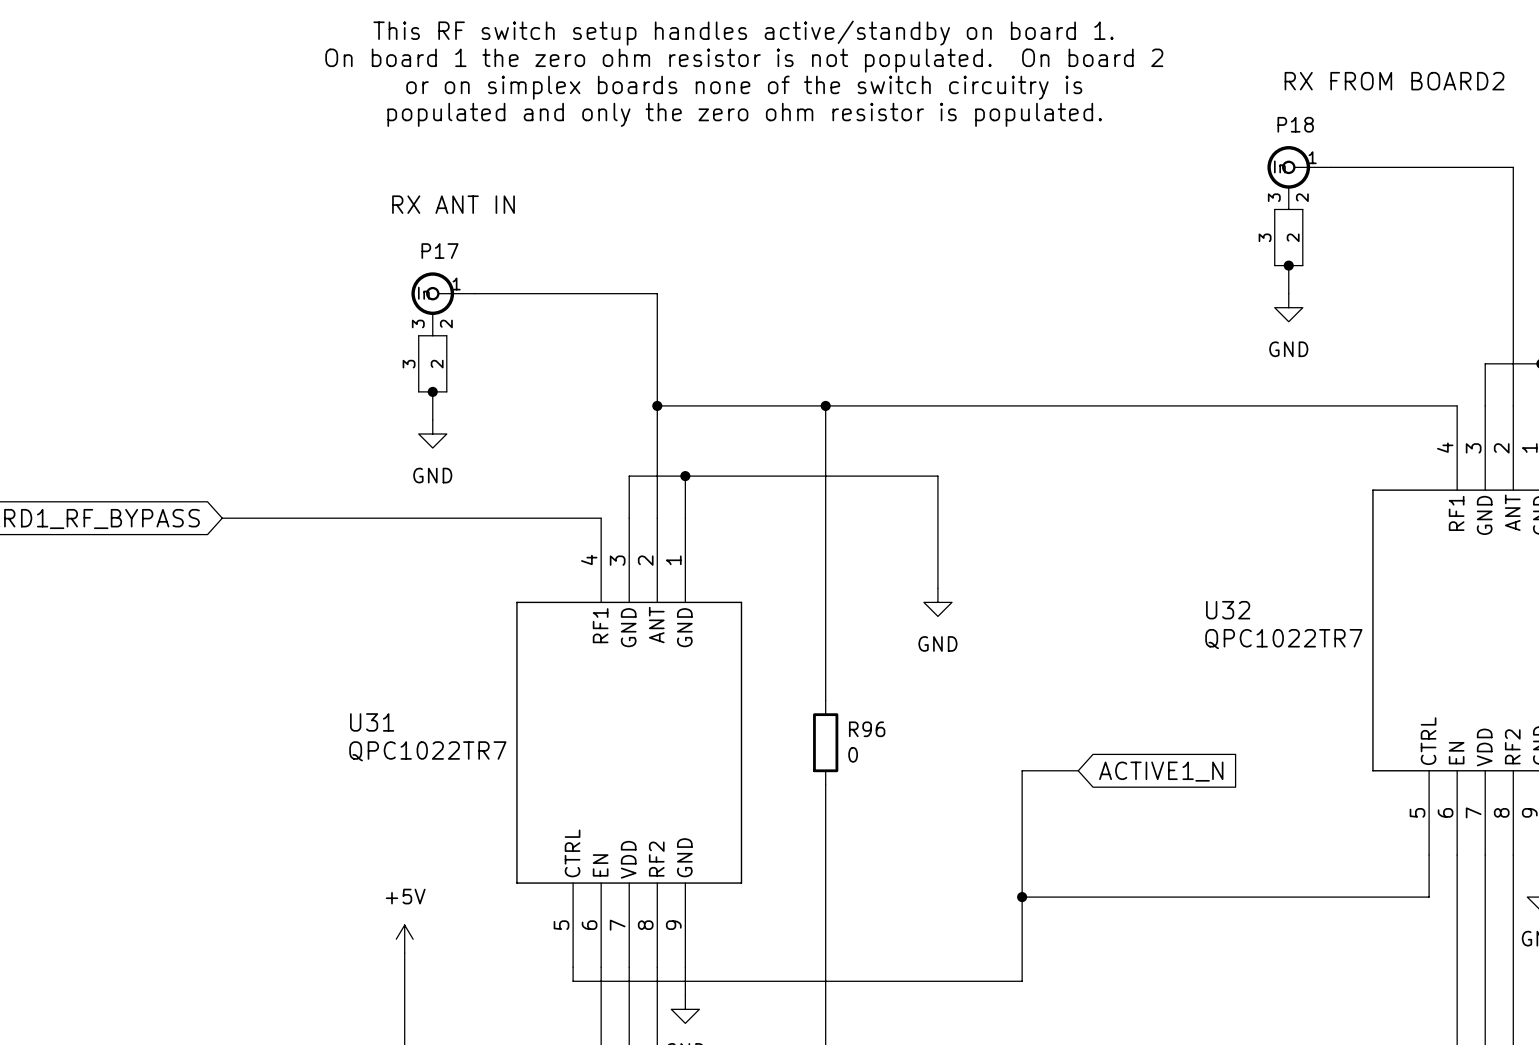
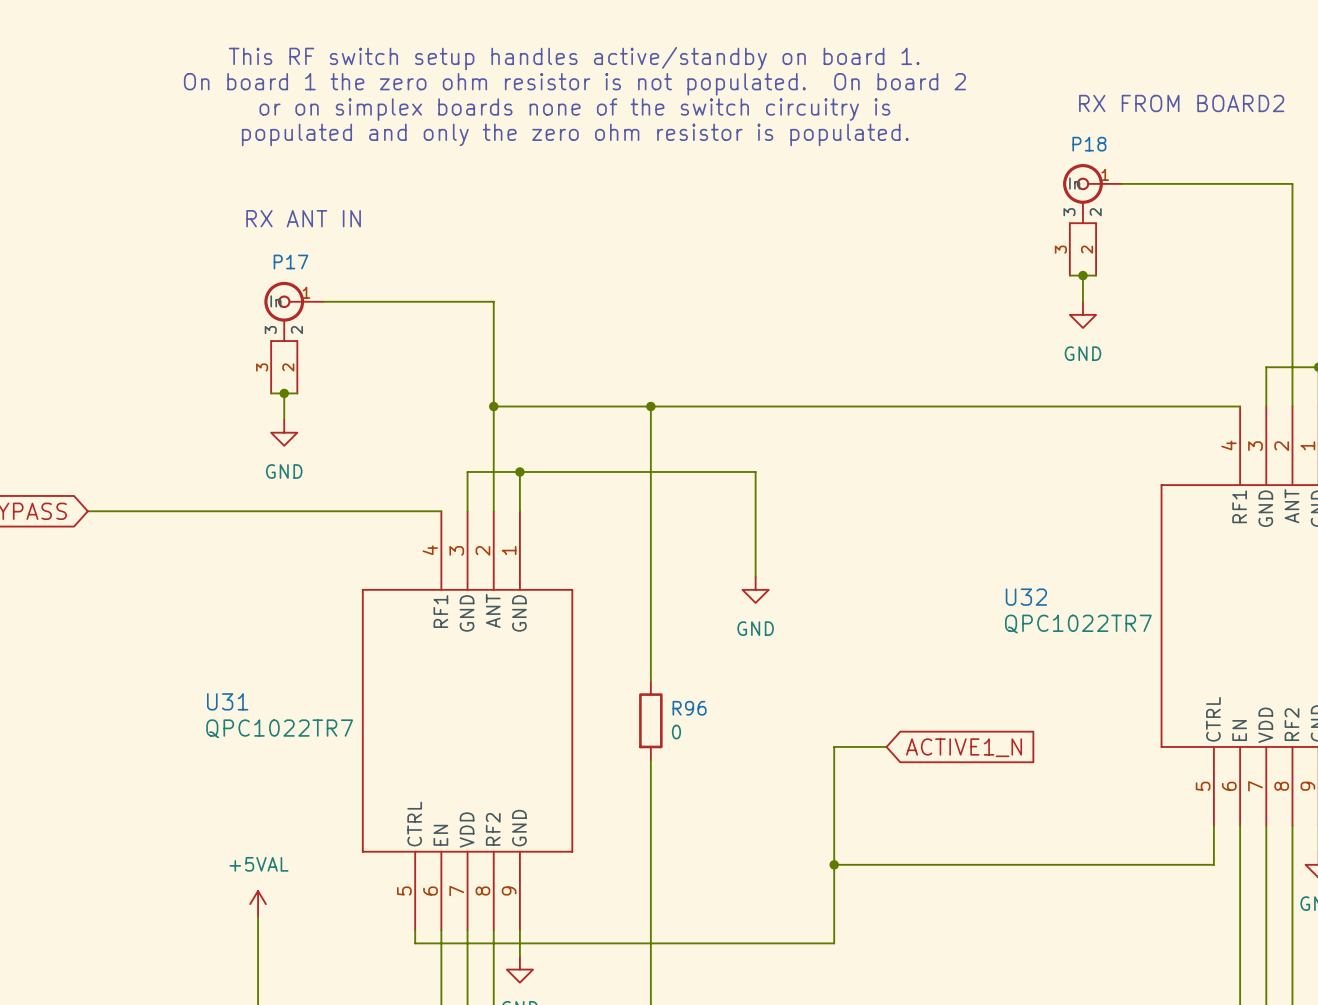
power symbol: +5V (404, 939) -> +5VAL (258, 904)

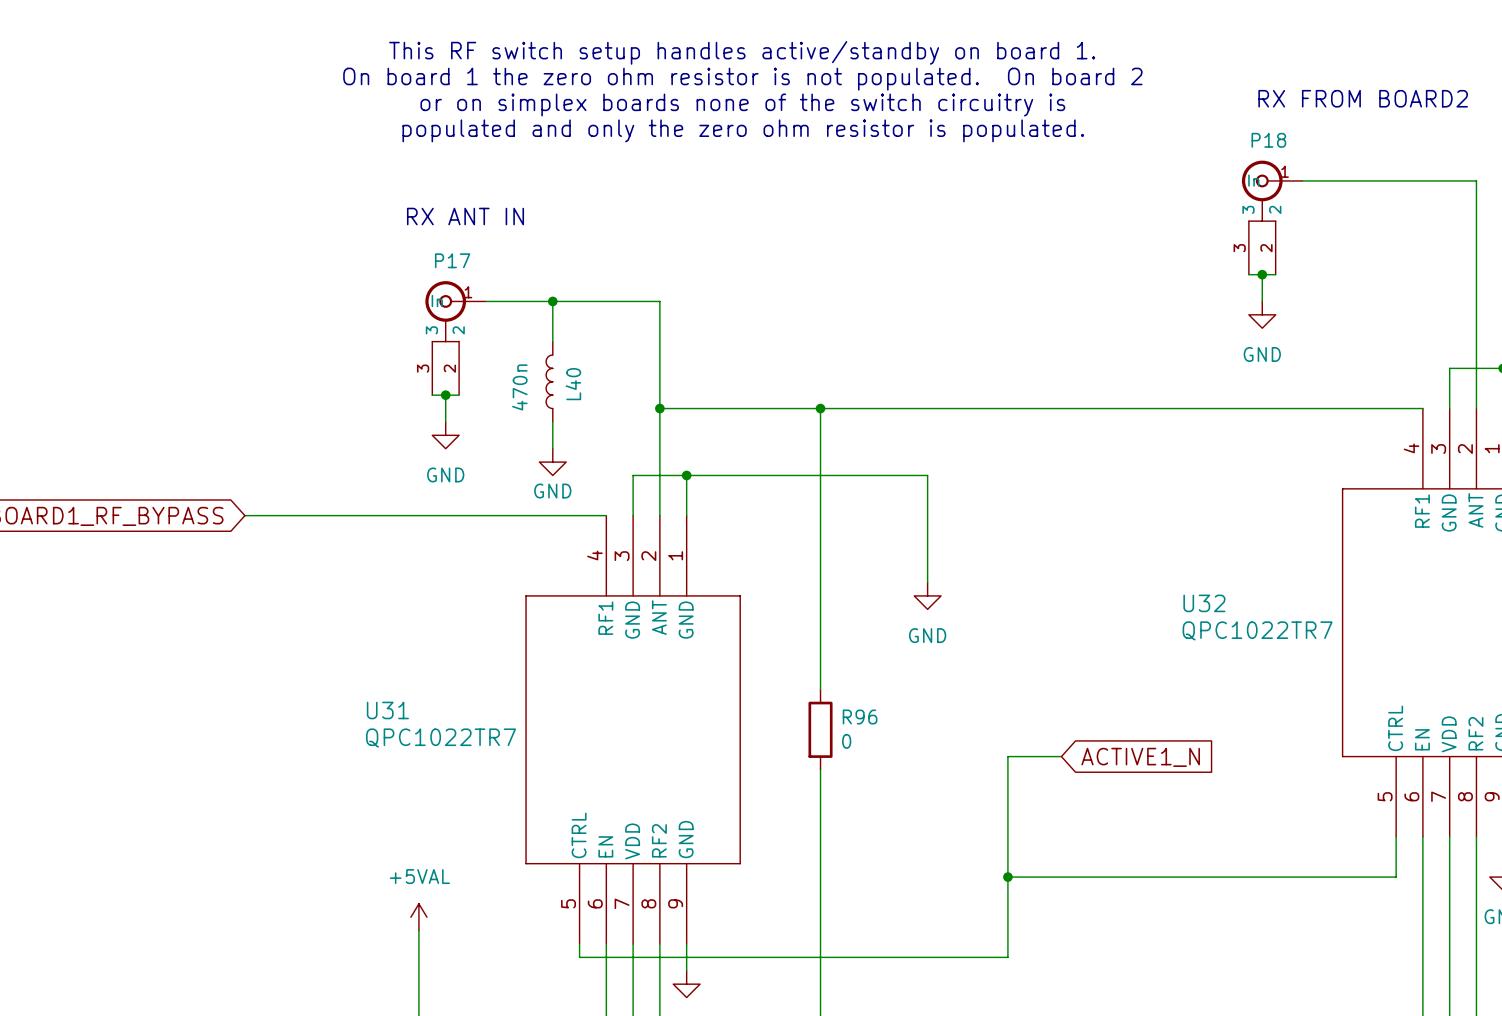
wire: none -> (552, 301) (552, 341)
junction: none -> (552, 301)
L40: none -> 470n (549, 381)
wire: none -> (552, 421) (552, 448)
power symbol: none -> GND (552, 462)

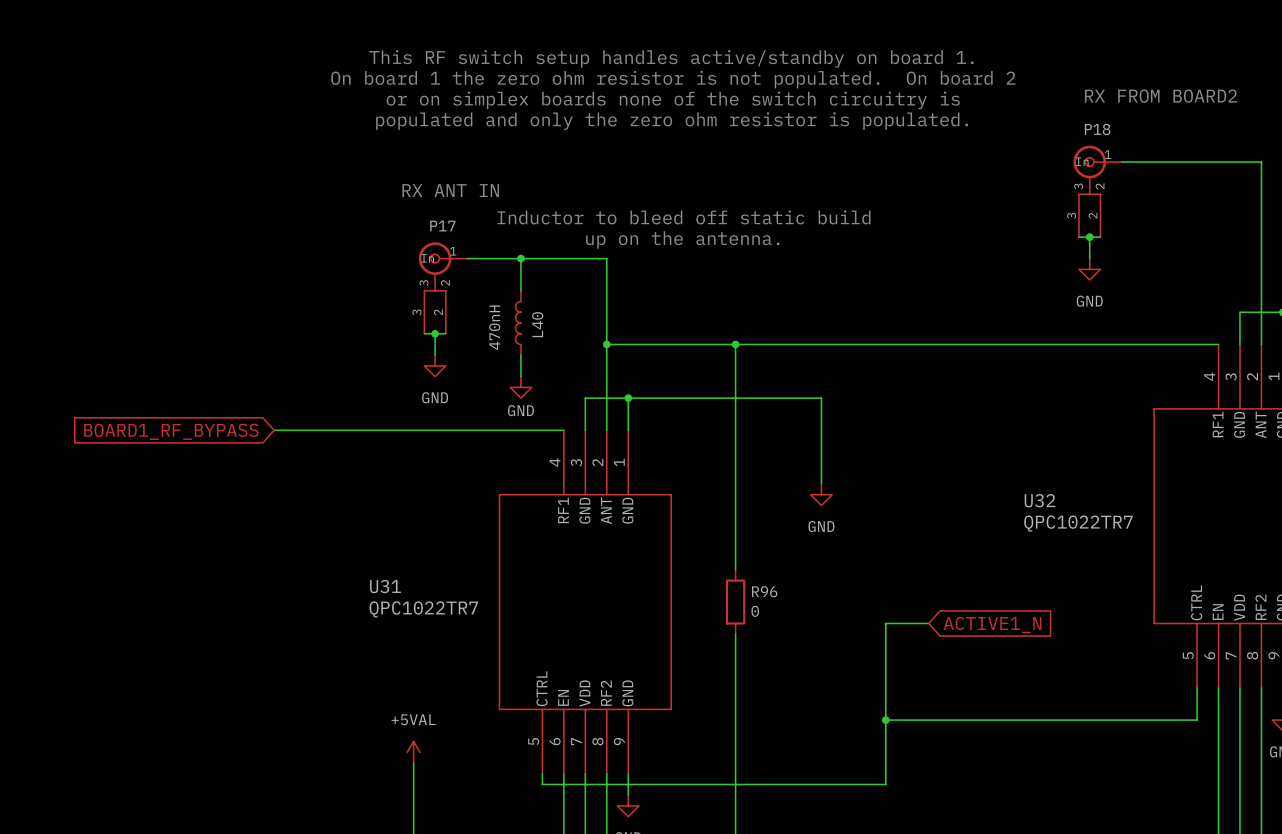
text: none -> Inductor to bleed off static build (683, 217)
text: none -> up on the antenna. (682, 239)
L40 value: 470n (519, 387) -> 470nH (494, 327)

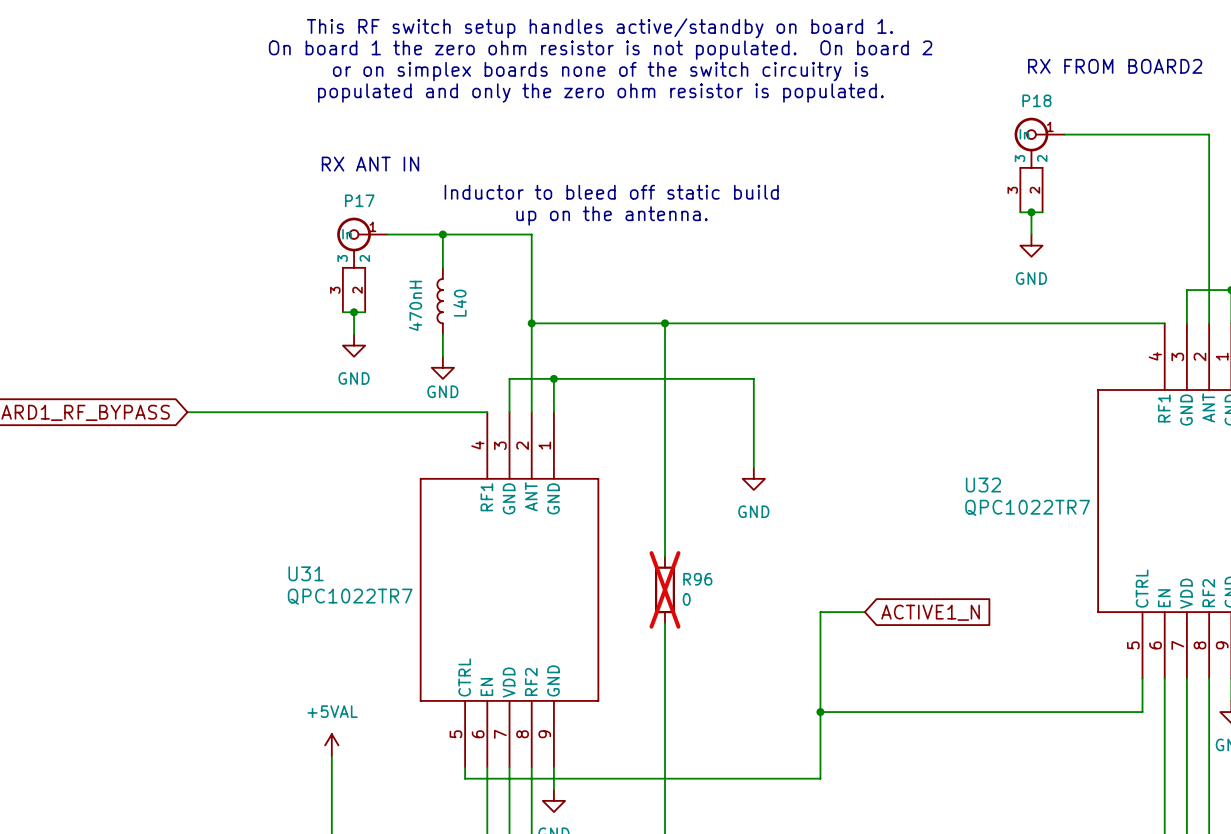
R96 do-not-place cross: none -> (664, 589)

